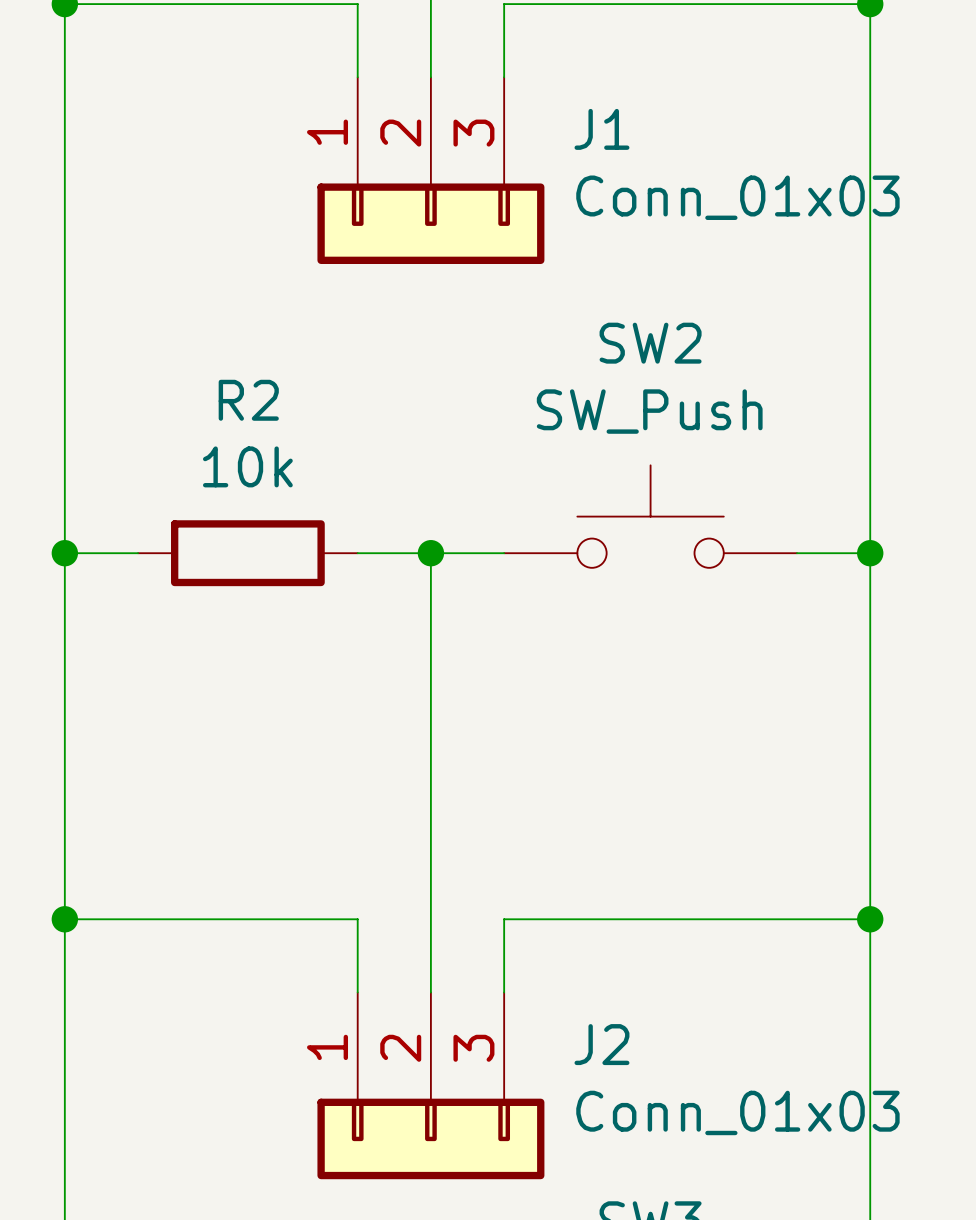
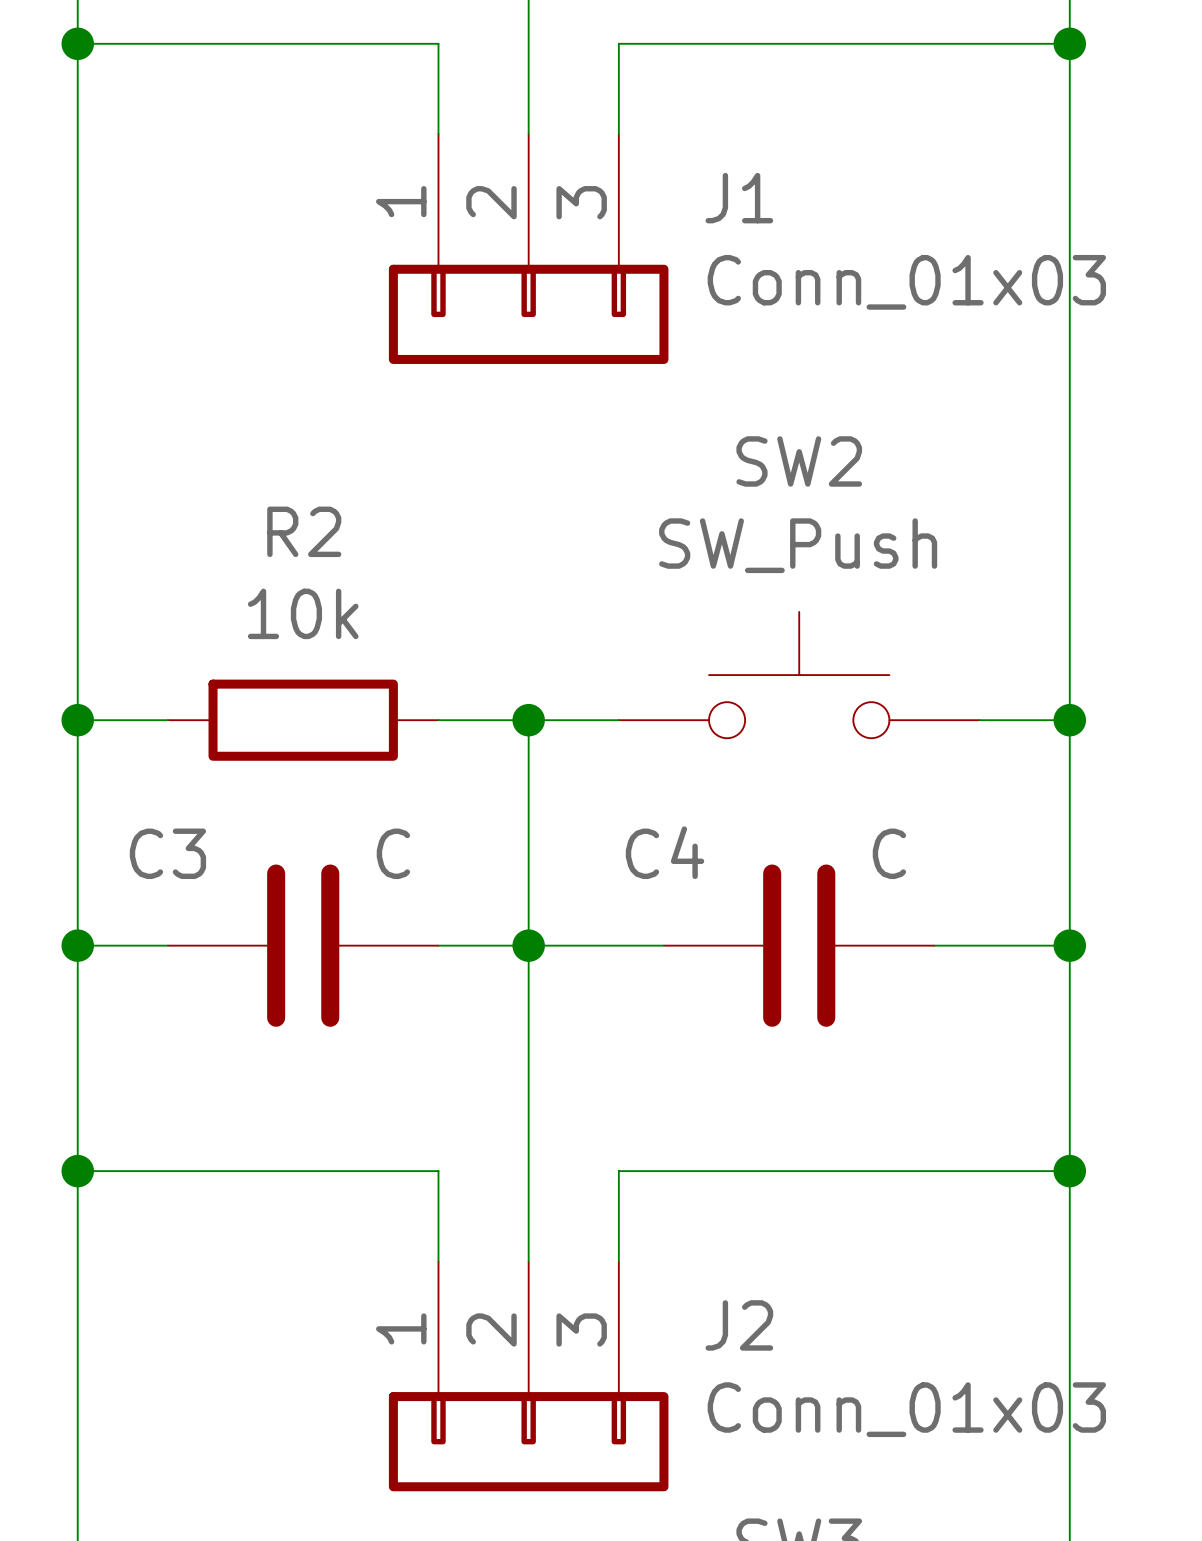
wire: none -> (77, 945) (167, 945)
junction: none -> (77, 945)
C3: none -> C (303, 945)
wire: none -> (438, 945) (663, 945)
junction: none -> (528, 945)
C4: none -> C (799, 945)
wire: none -> (934, 945) (1069, 945)
junction: none -> (1069, 945)

